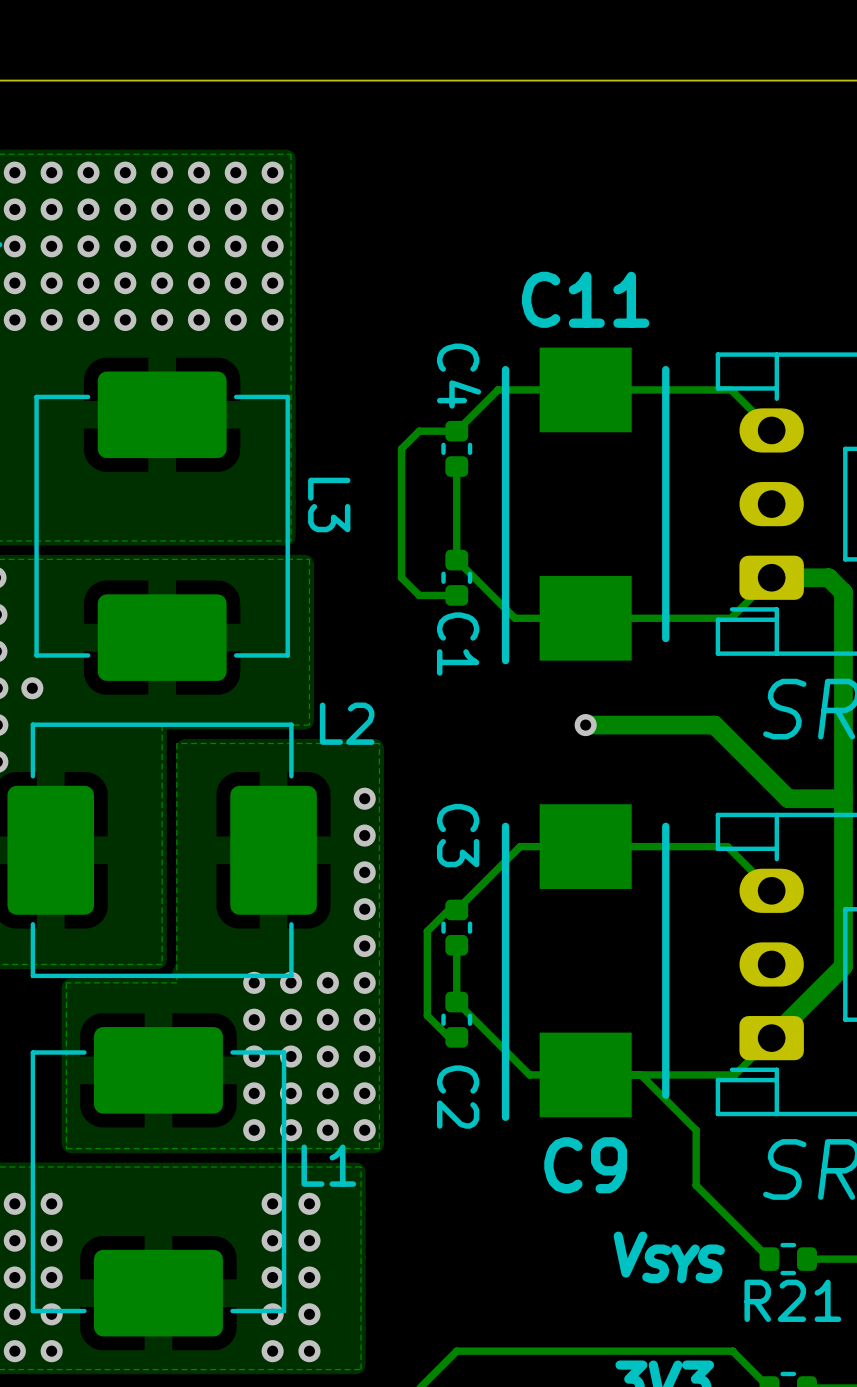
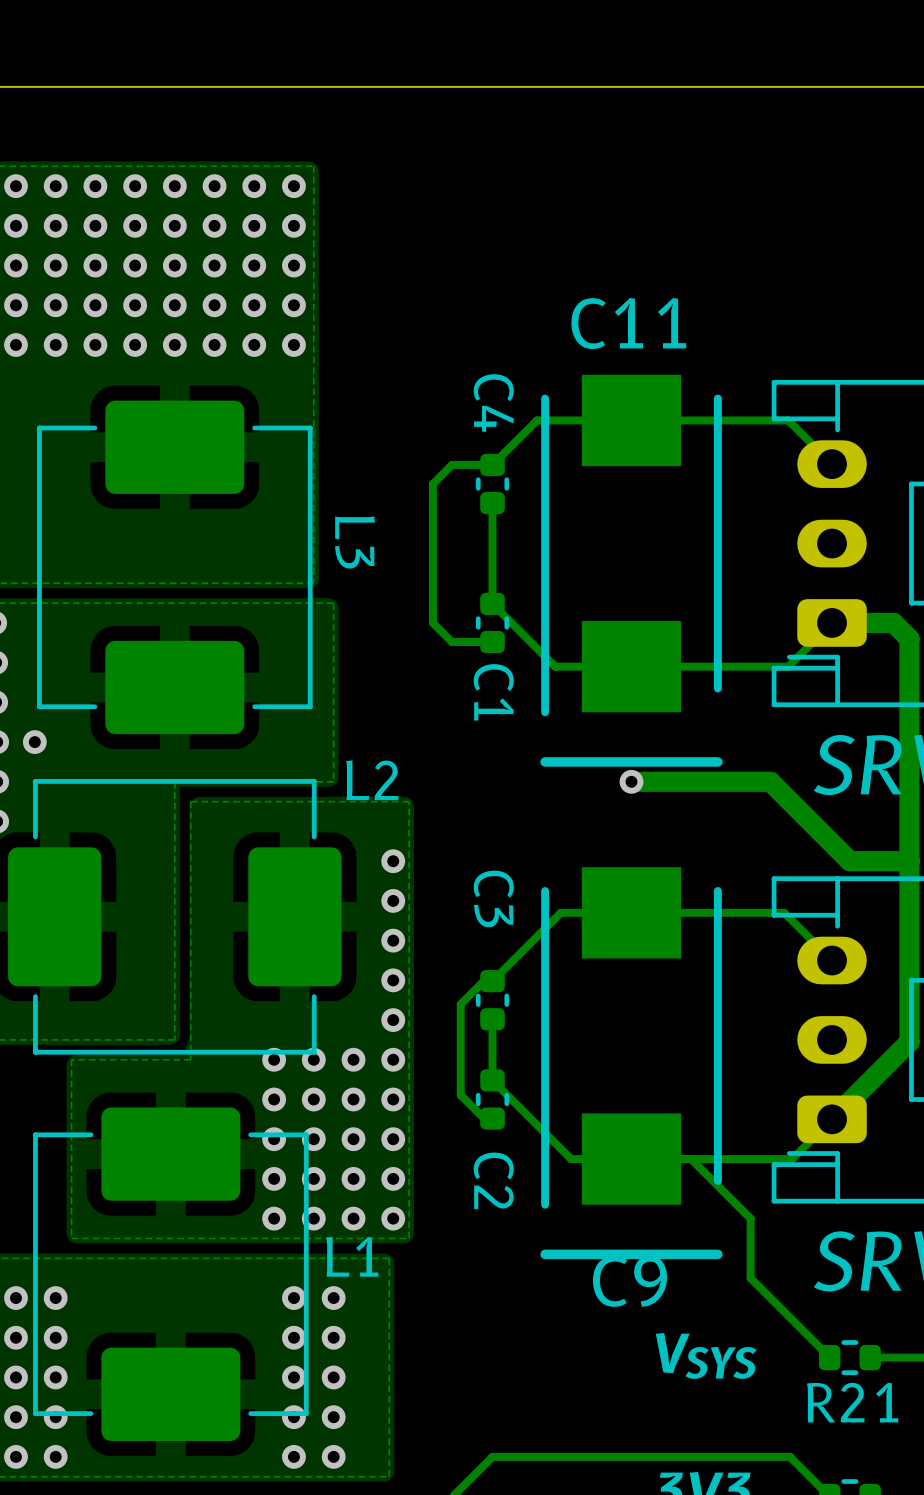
C11 footprint: [501, 347, 670, 665] -> [540, 374, 723, 767]
C9 footprint: [501, 804, 670, 1121] -> [540, 867, 723, 1260]

